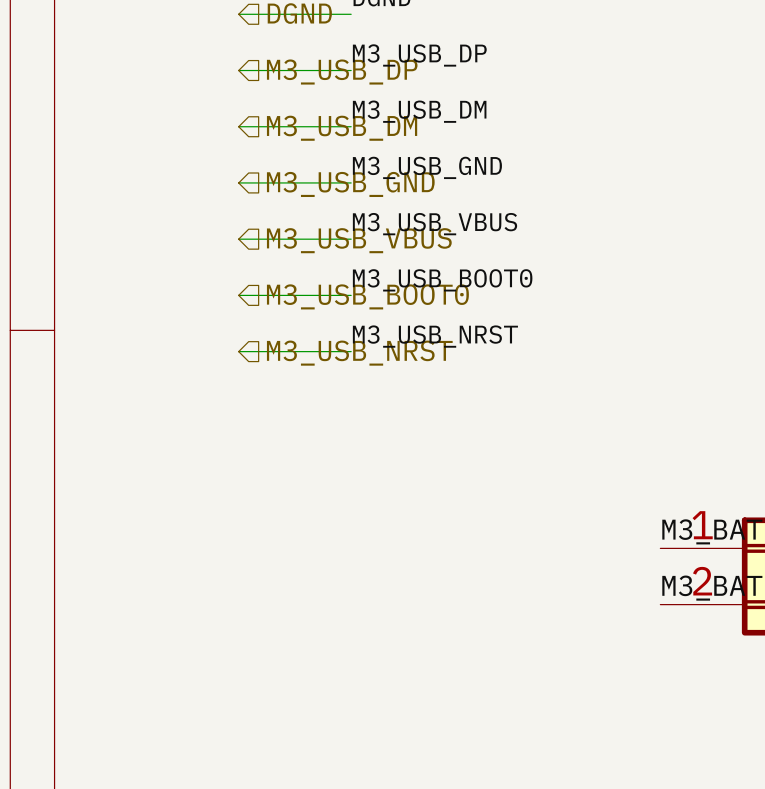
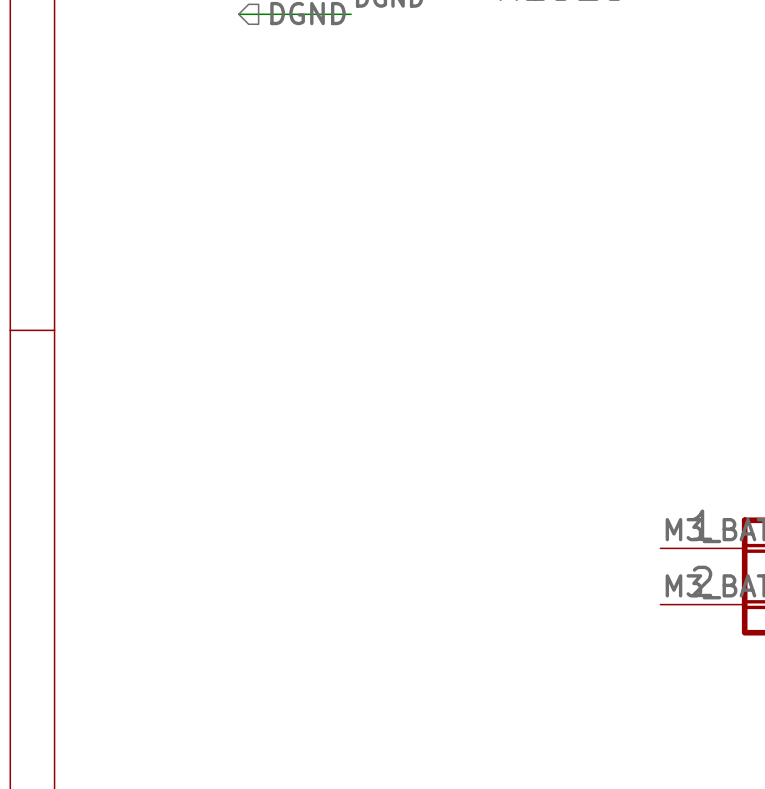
label: M3_USB_DP (419, 55) -> none
wire: (238, 70) (351, 70) -> none
hierarchical label: M3_USB_DP (342, 72) -> none
label: M3_USB_DM (419, 111) -> none
wire: (238, 126) (351, 126) -> none
hierarchical label: M3_USB_DM (342, 128) -> none
label: M3_USB_GND (427, 167) -> none
wire: (238, 182) (351, 182) -> none
hierarchical label: M3_USB_GND (350, 184) -> none
label: M3_USB_VBUS (435, 224) -> none
wire: (238, 239) (351, 239) -> none
hierarchical label: M3_USB_VBUS (359, 240) -> none
label: M3_USB_BOOT0 (442, 280) -> none
wire: (238, 295) (351, 295) -> none
hierarchical label: M3_USB_BOOT0 (367, 296) -> none
label: M3_USB_NRST (435, 336) -> none
wire: (238, 351) (351, 351) -> none
hierarchical label: M3_USB_NRST (359, 353) -> none

